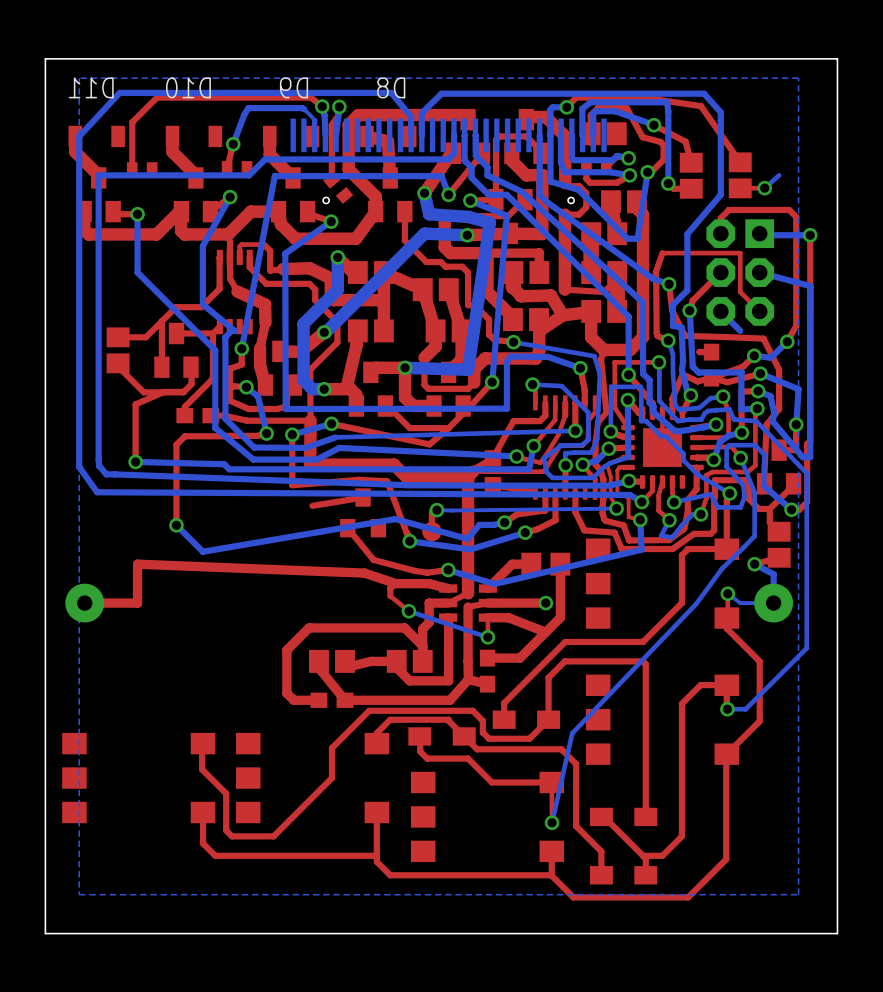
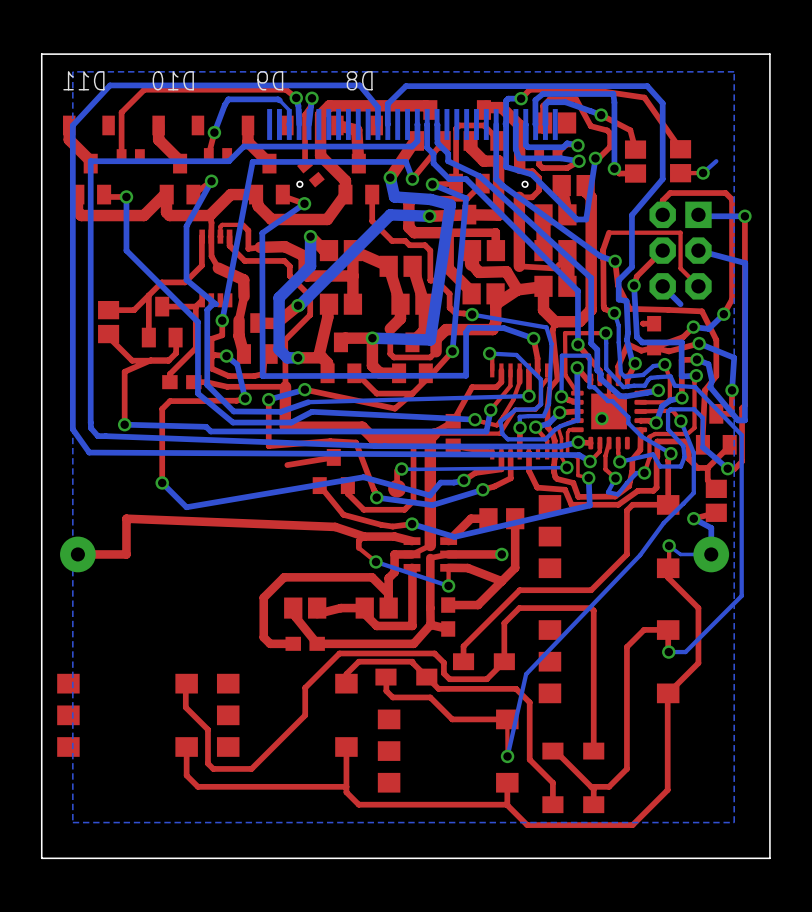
via: none -> (601, 418)
top track: none -> (413, 438) (413, 500) (404, 509) (363, 509) (347, 493) (347, 485)

